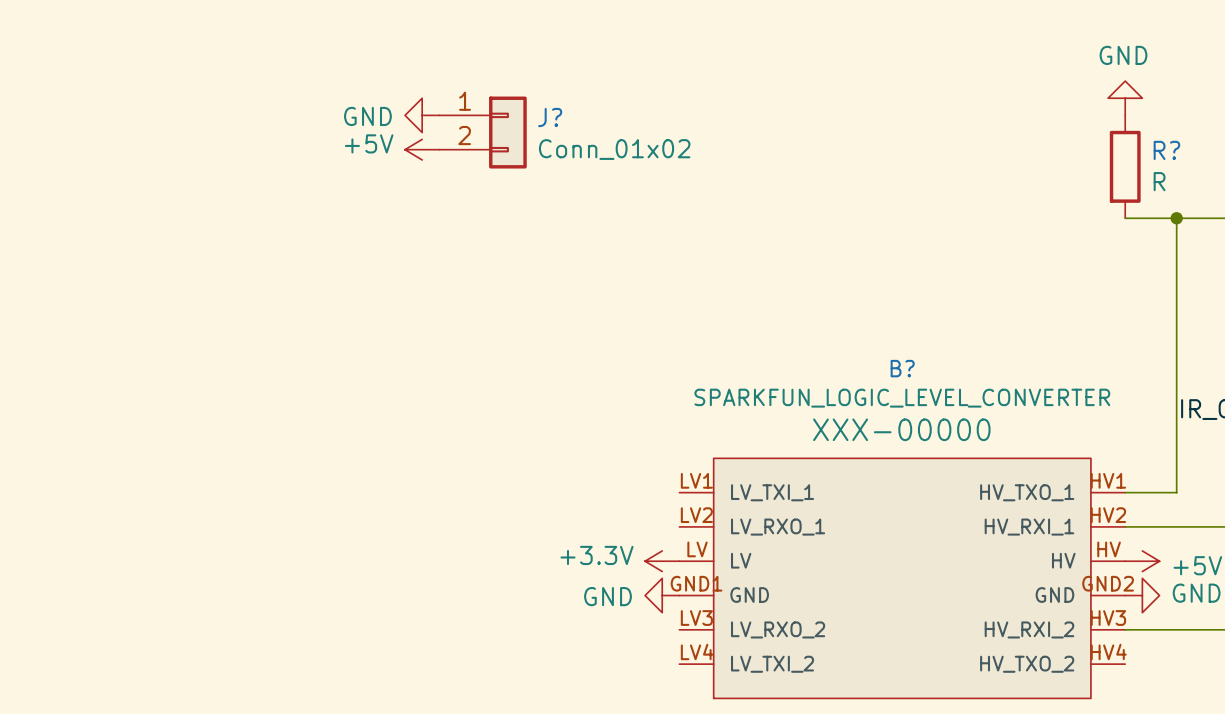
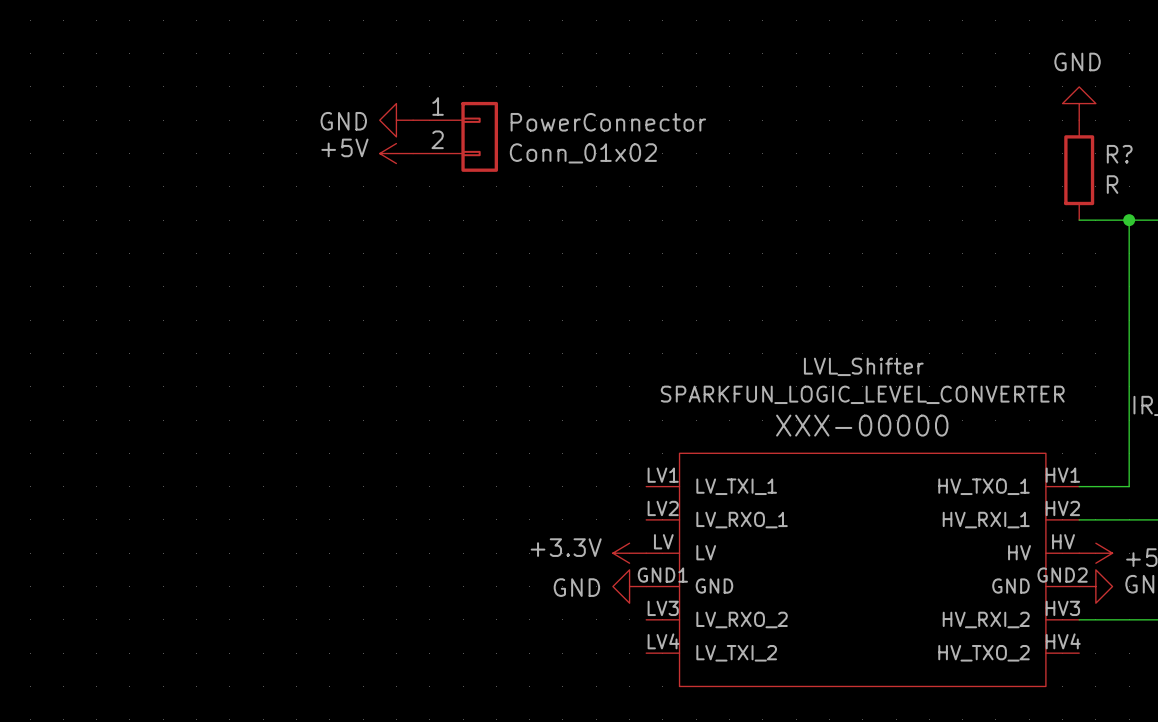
J? name: J? (550, 117) -> PowerConnector (608, 122)
B? name: B? (902, 368) -> LVL_Shifter (863, 366)

